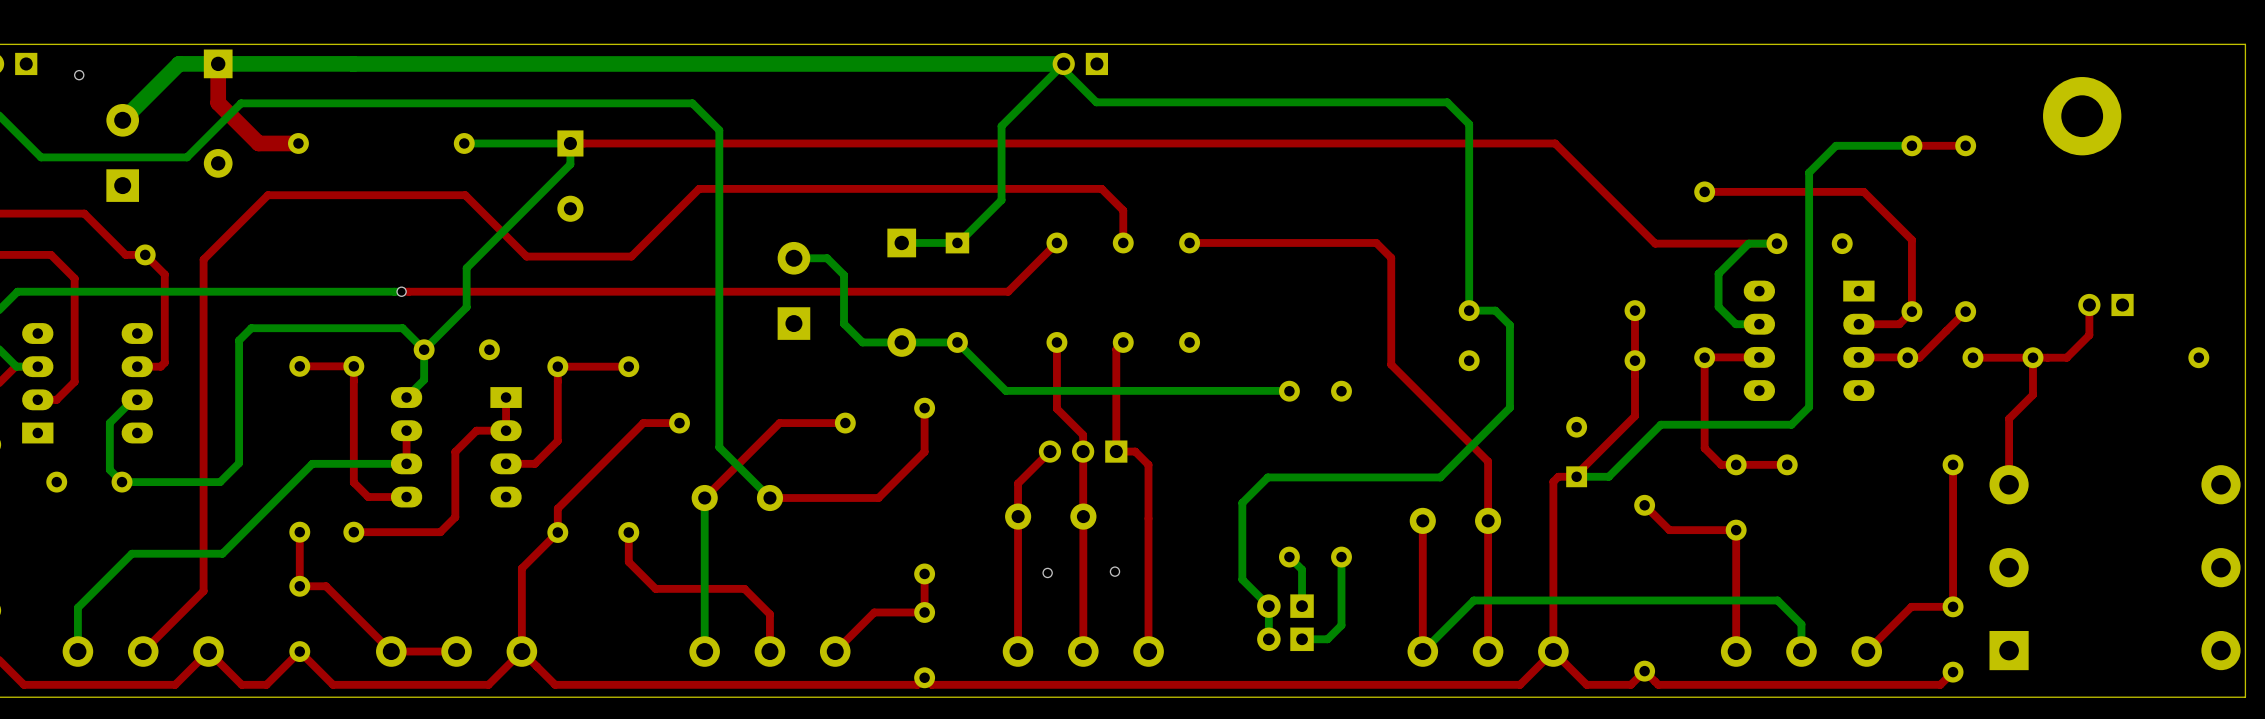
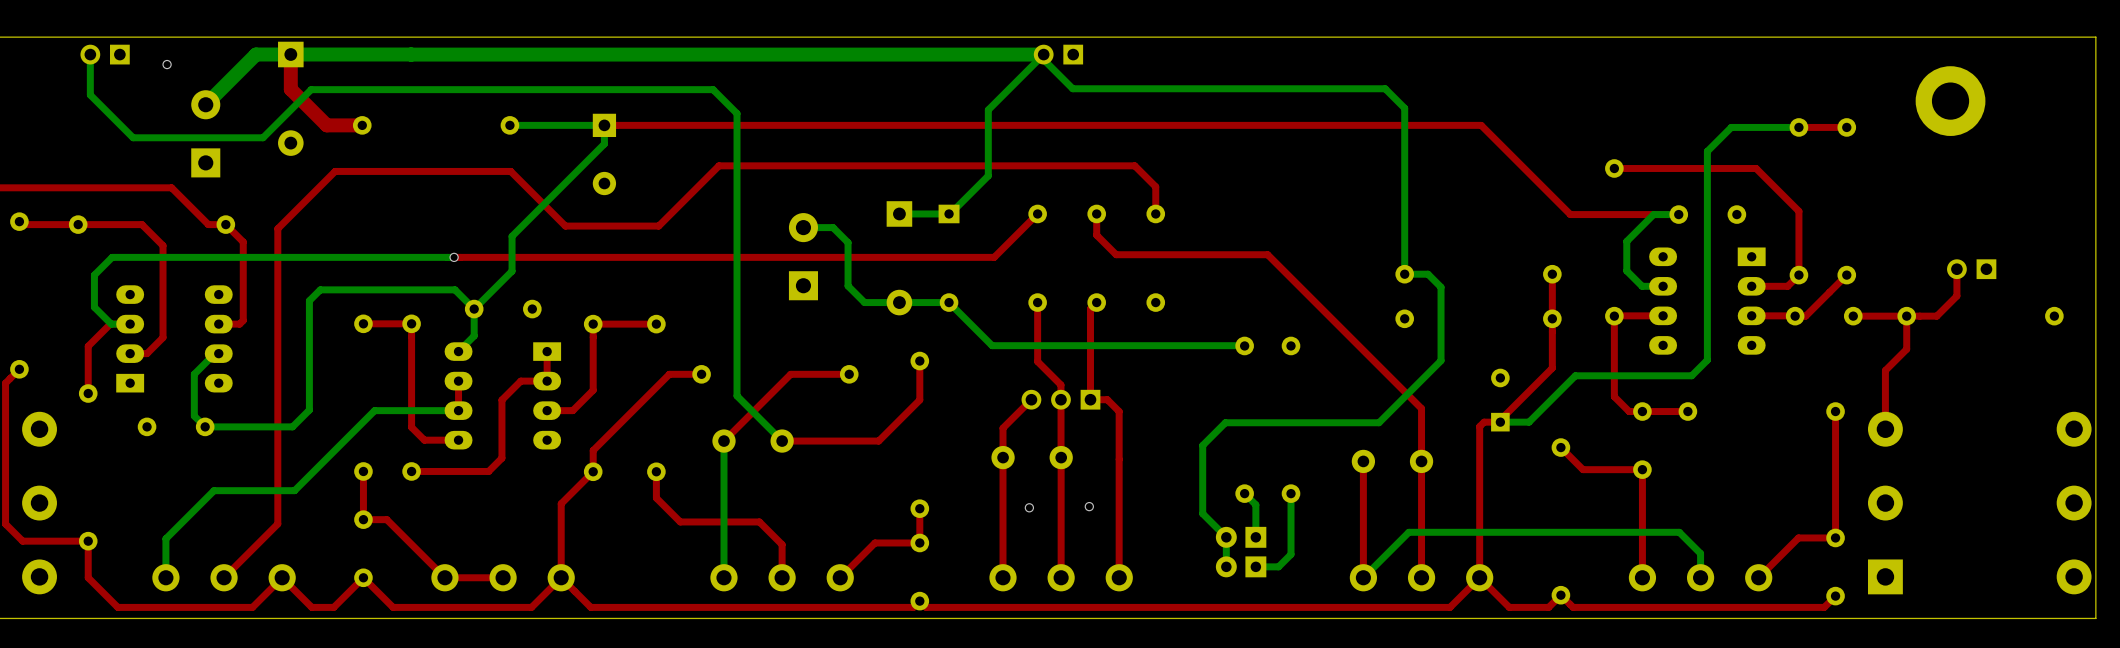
top track: (1101, 188) (1123, 210) (1123, 242) -> (1077, 165) (1134, 165) (1155, 186) (1155, 213)
top track: (1189, 242) (1376, 242) (1391, 257) (1391, 364) -> (1096, 213) (1096, 235) (1116, 254) (1267, 254) (1335, 322)

